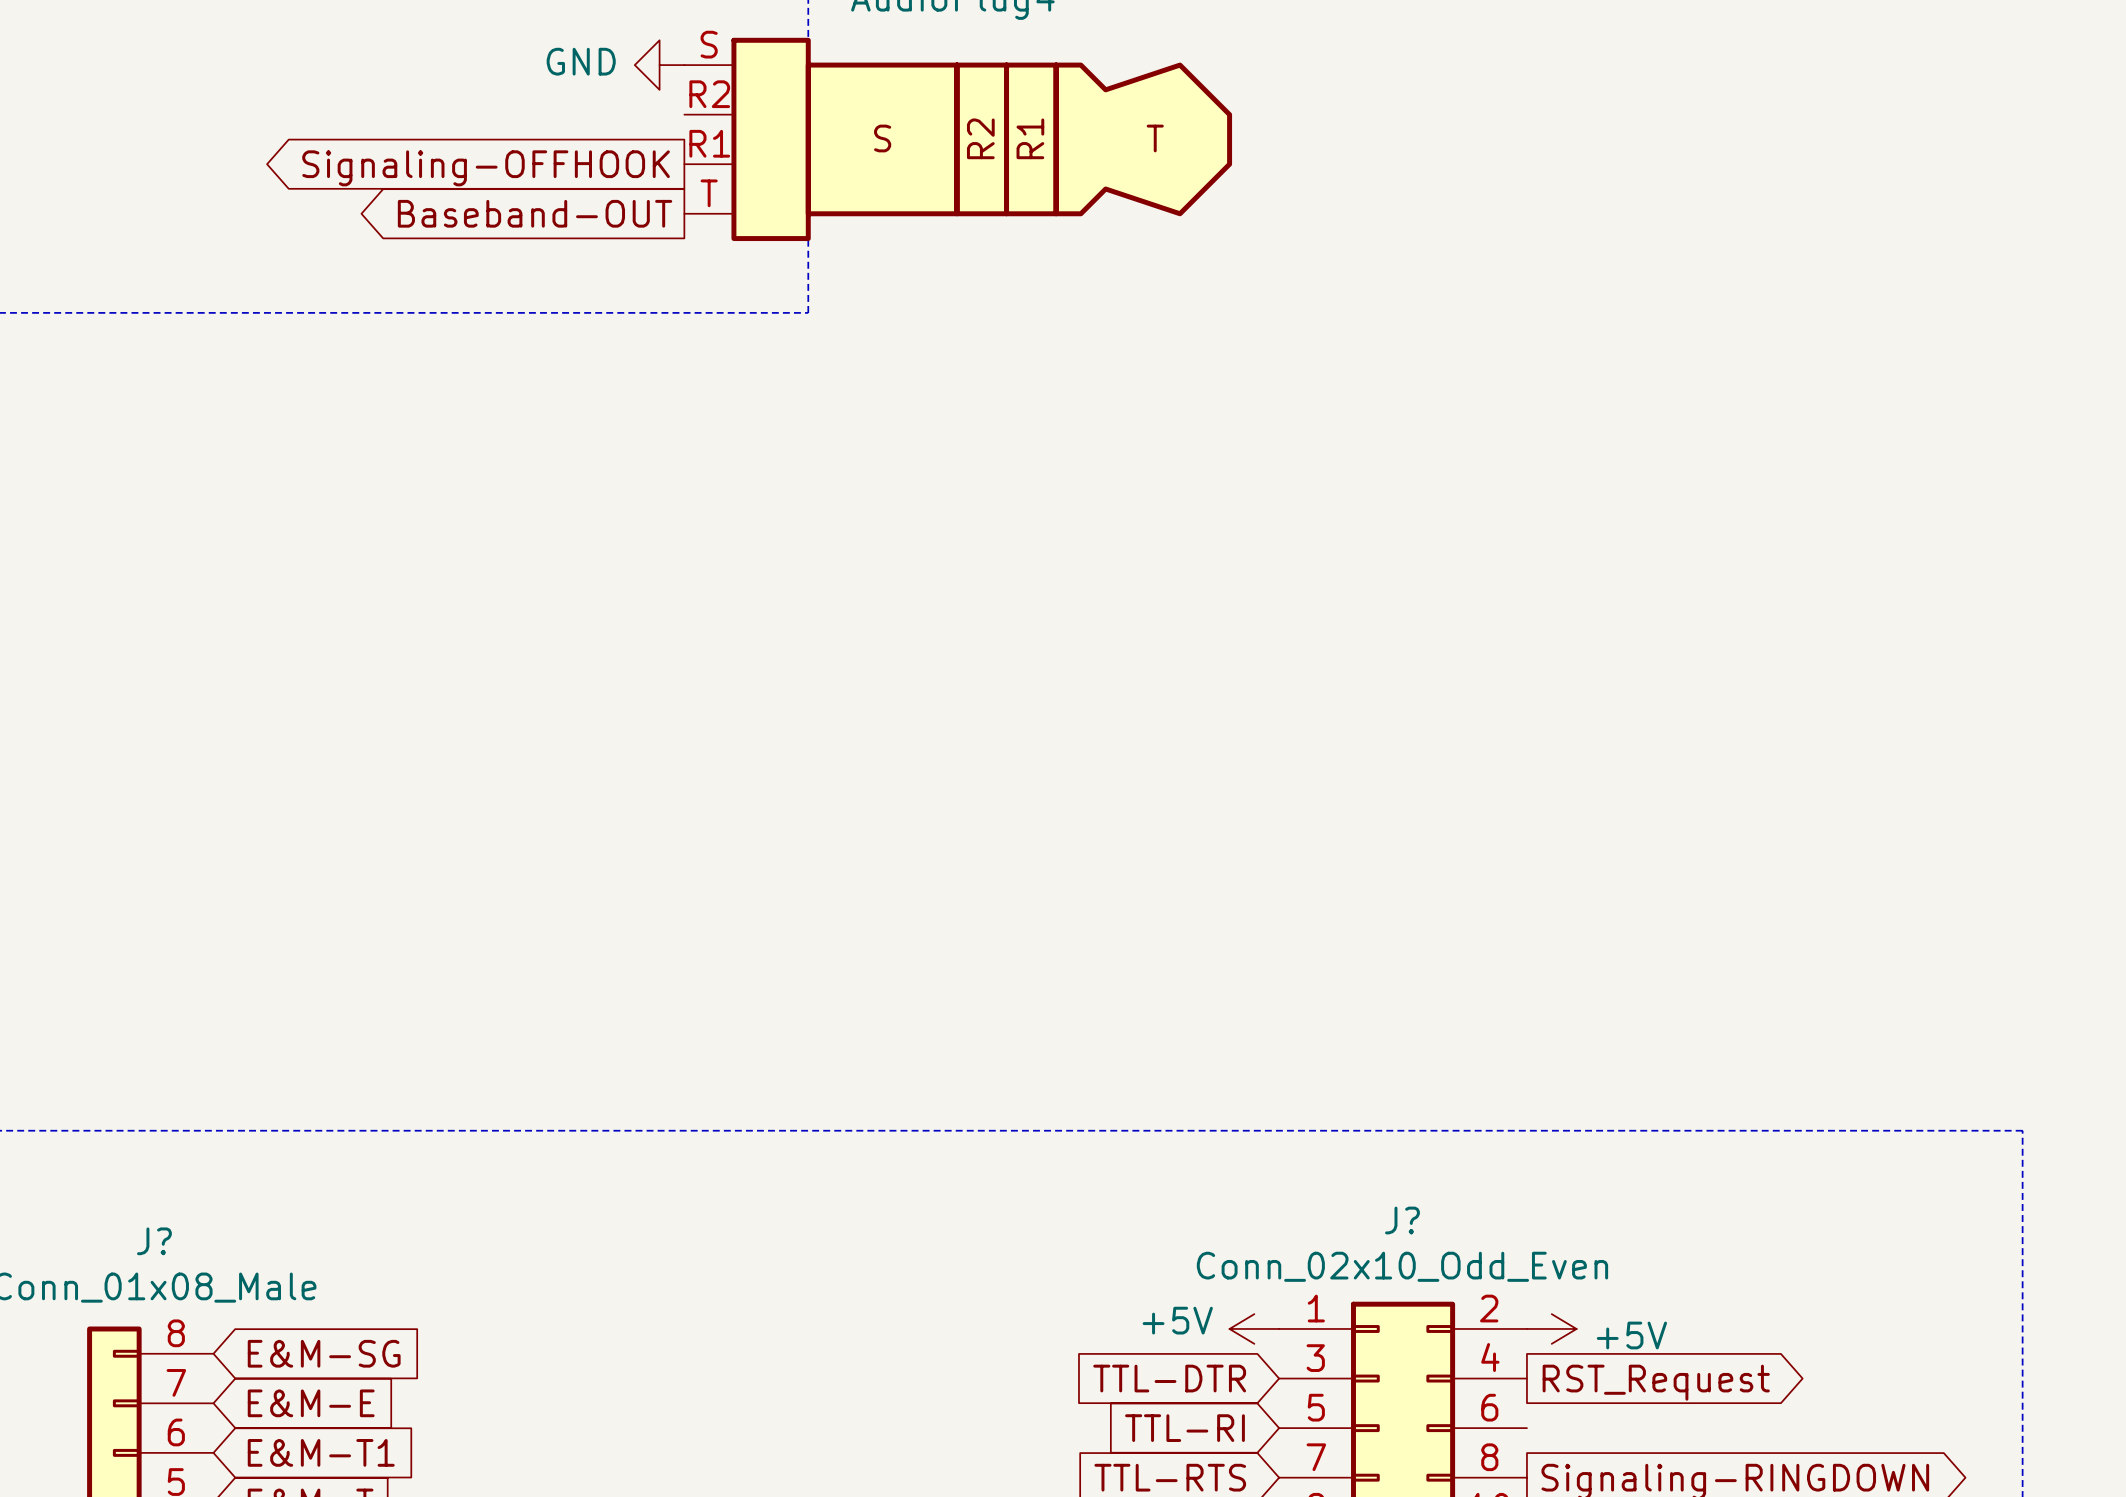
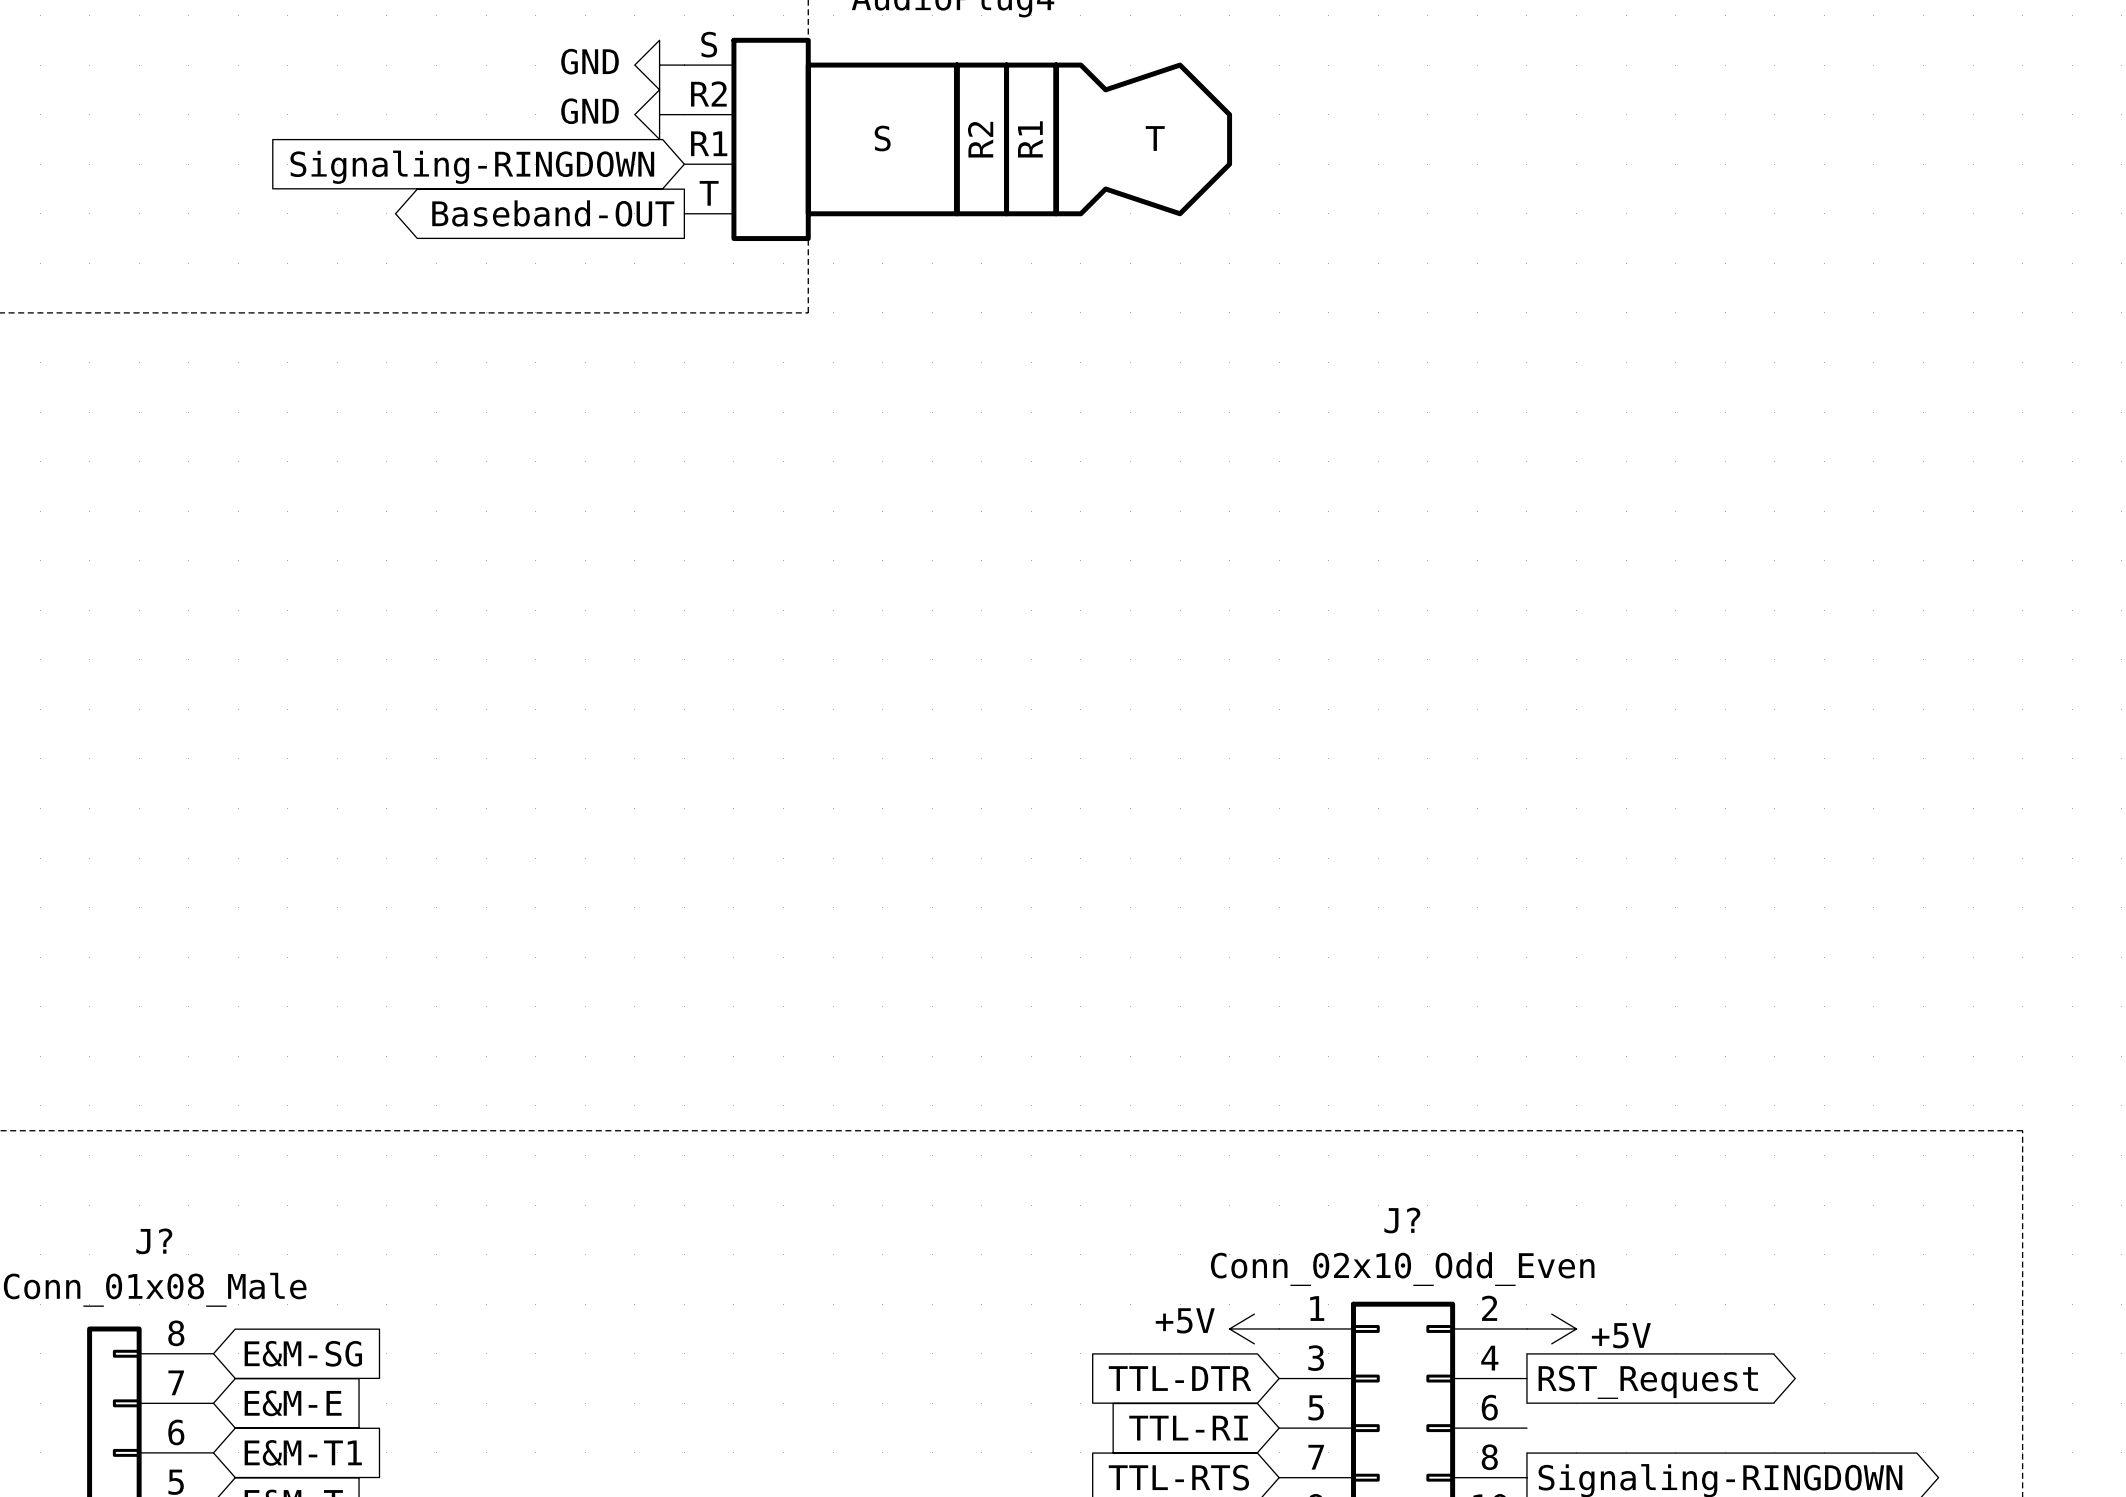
power symbol: none -> GND (659, 114)
global label shape: output (486, 168) -> input (472, 167)
global label: Signaling-OFFHOOK (486, 168) -> Signaling-RINGDOWN (472, 167)

